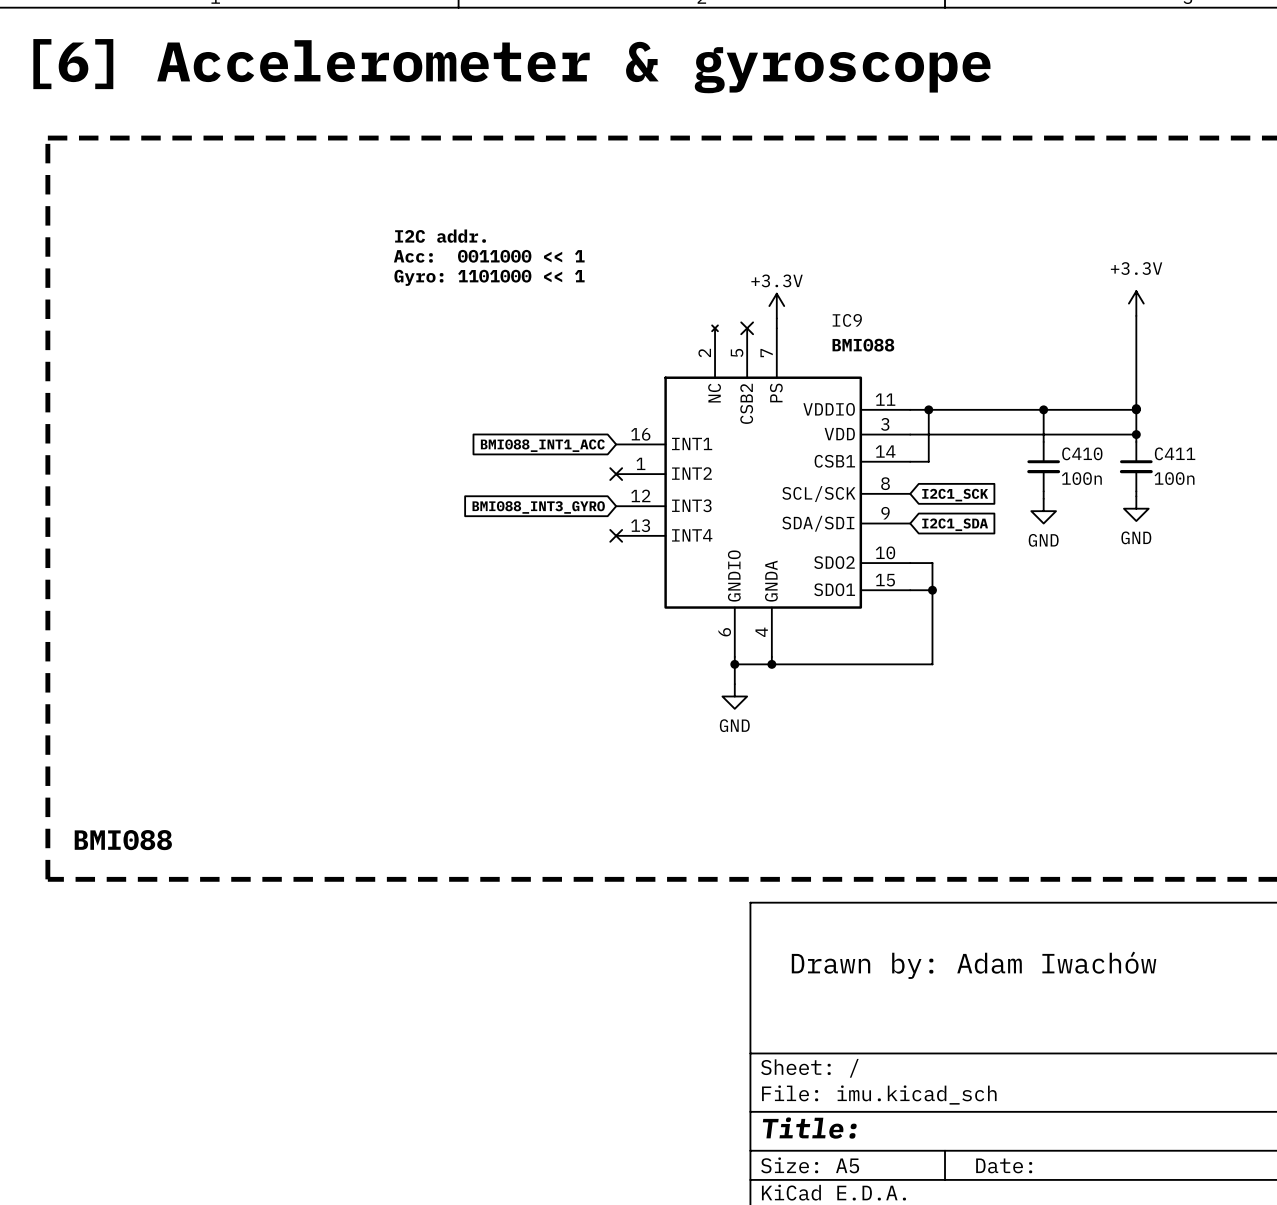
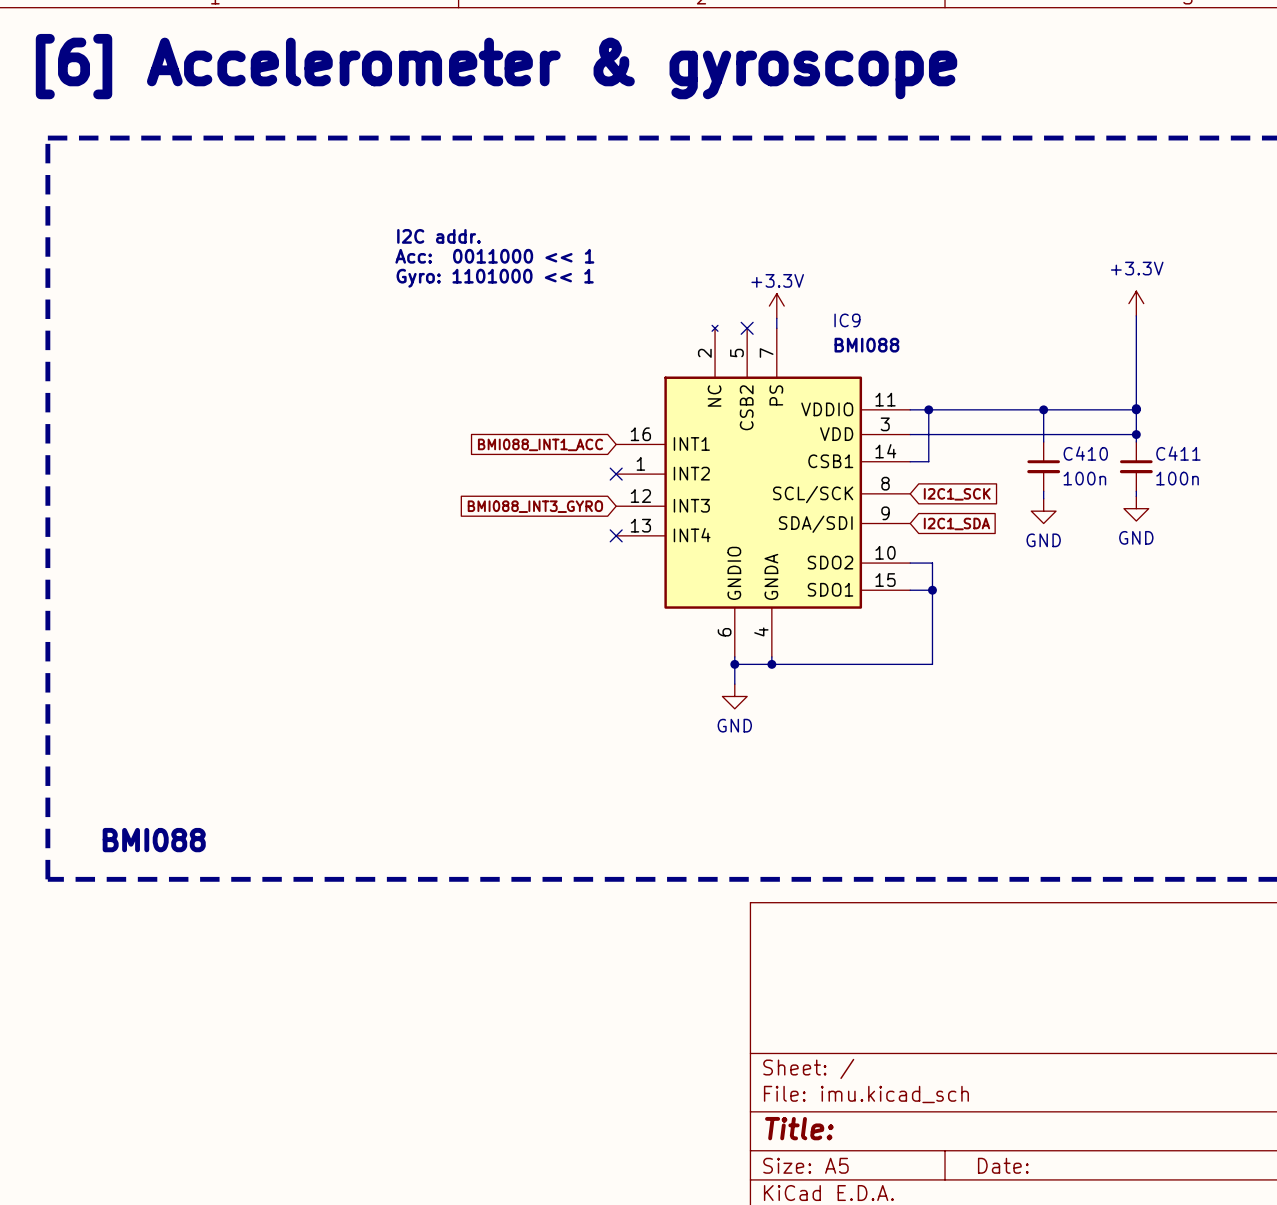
text position: BMI088 (123, 840) -> BMI088 (154, 840)
text: Drawn by: Adam Iwachów (974, 965) -> none

